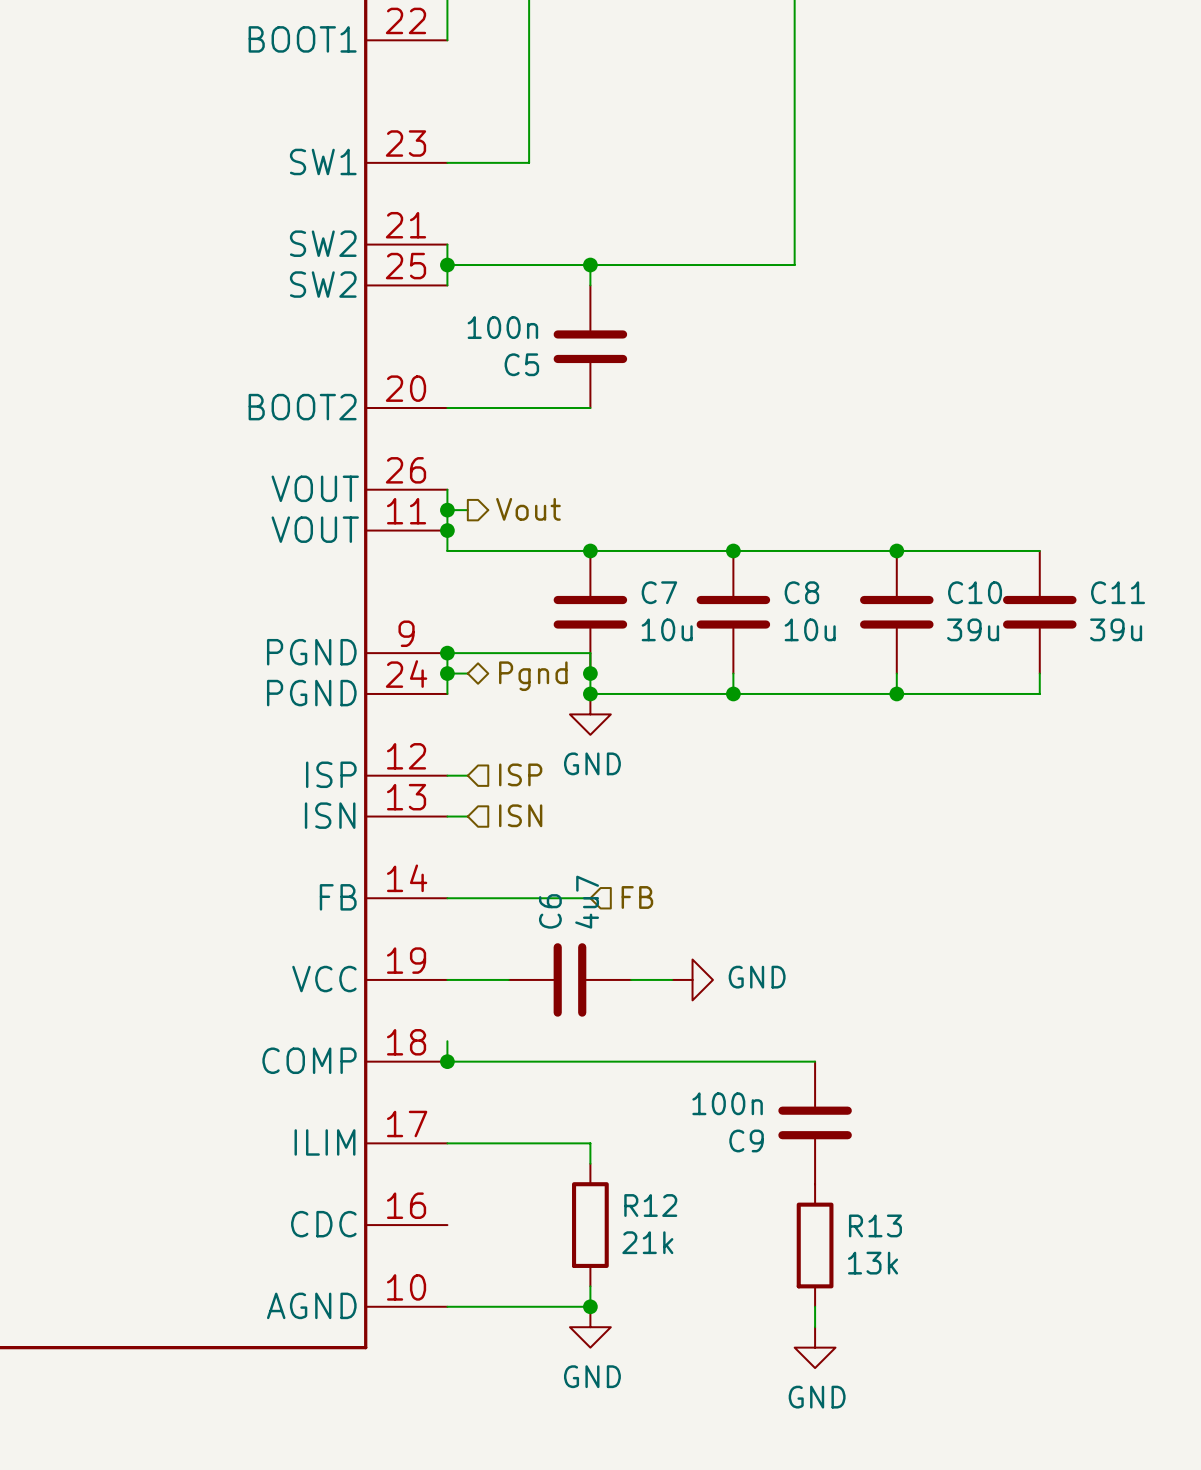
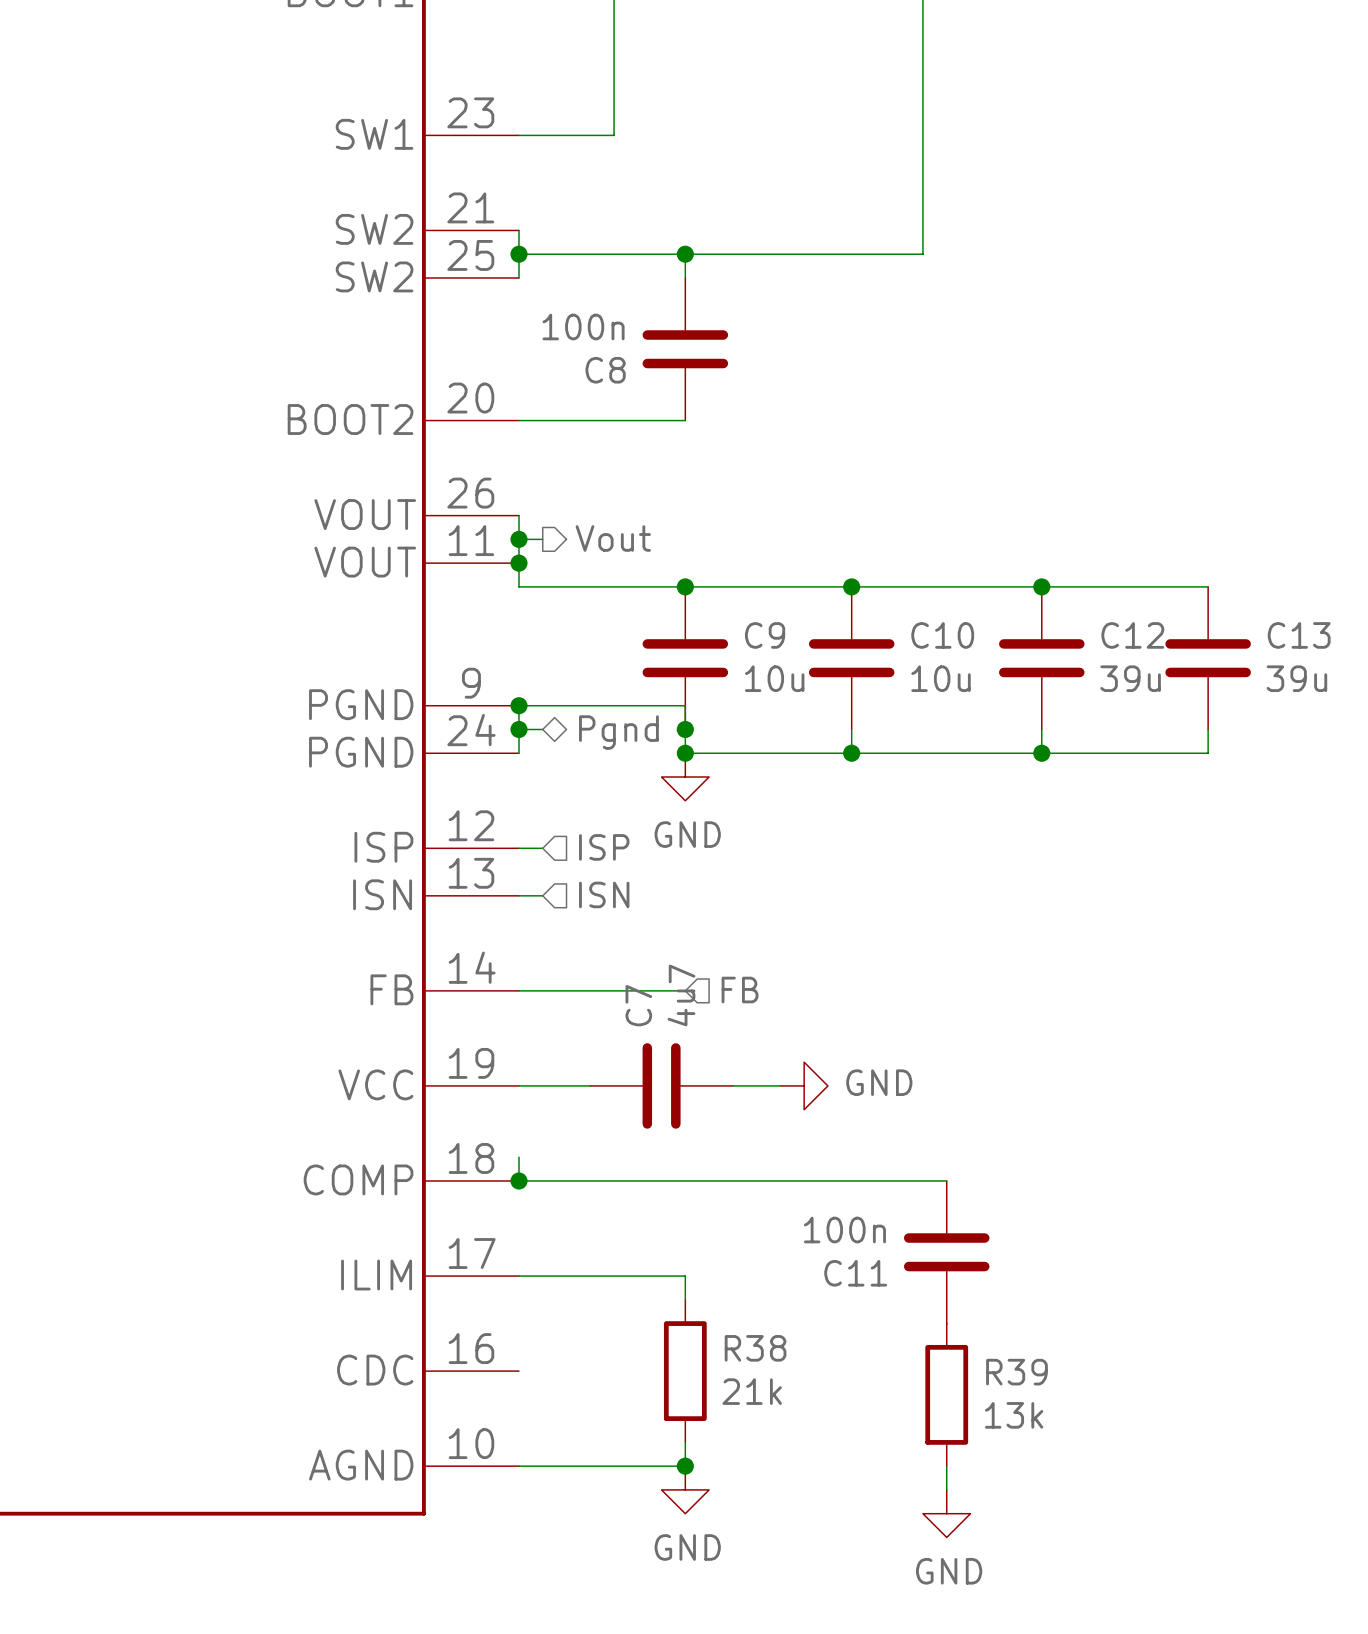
C5 name: C5 (521, 364) -> C8 (605, 370)
C7 name: C7 (659, 592) -> C9 (765, 635)
C8 name: C8 (801, 592) -> C10 (942, 635)
C10 name: C10 (975, 592) -> C12 (1132, 635)
C11 name: C11 (1118, 592) -> C13 (1299, 635)
C6 name: C6 (550, 911) -> C7 (638, 1005)
C9 name: C9 (746, 1140) -> C11 (855, 1273)
R12 name: R12 (650, 1205) -> R38 (755, 1348)
R13 name: R13 (875, 1225) -> R39 (1016, 1372)

